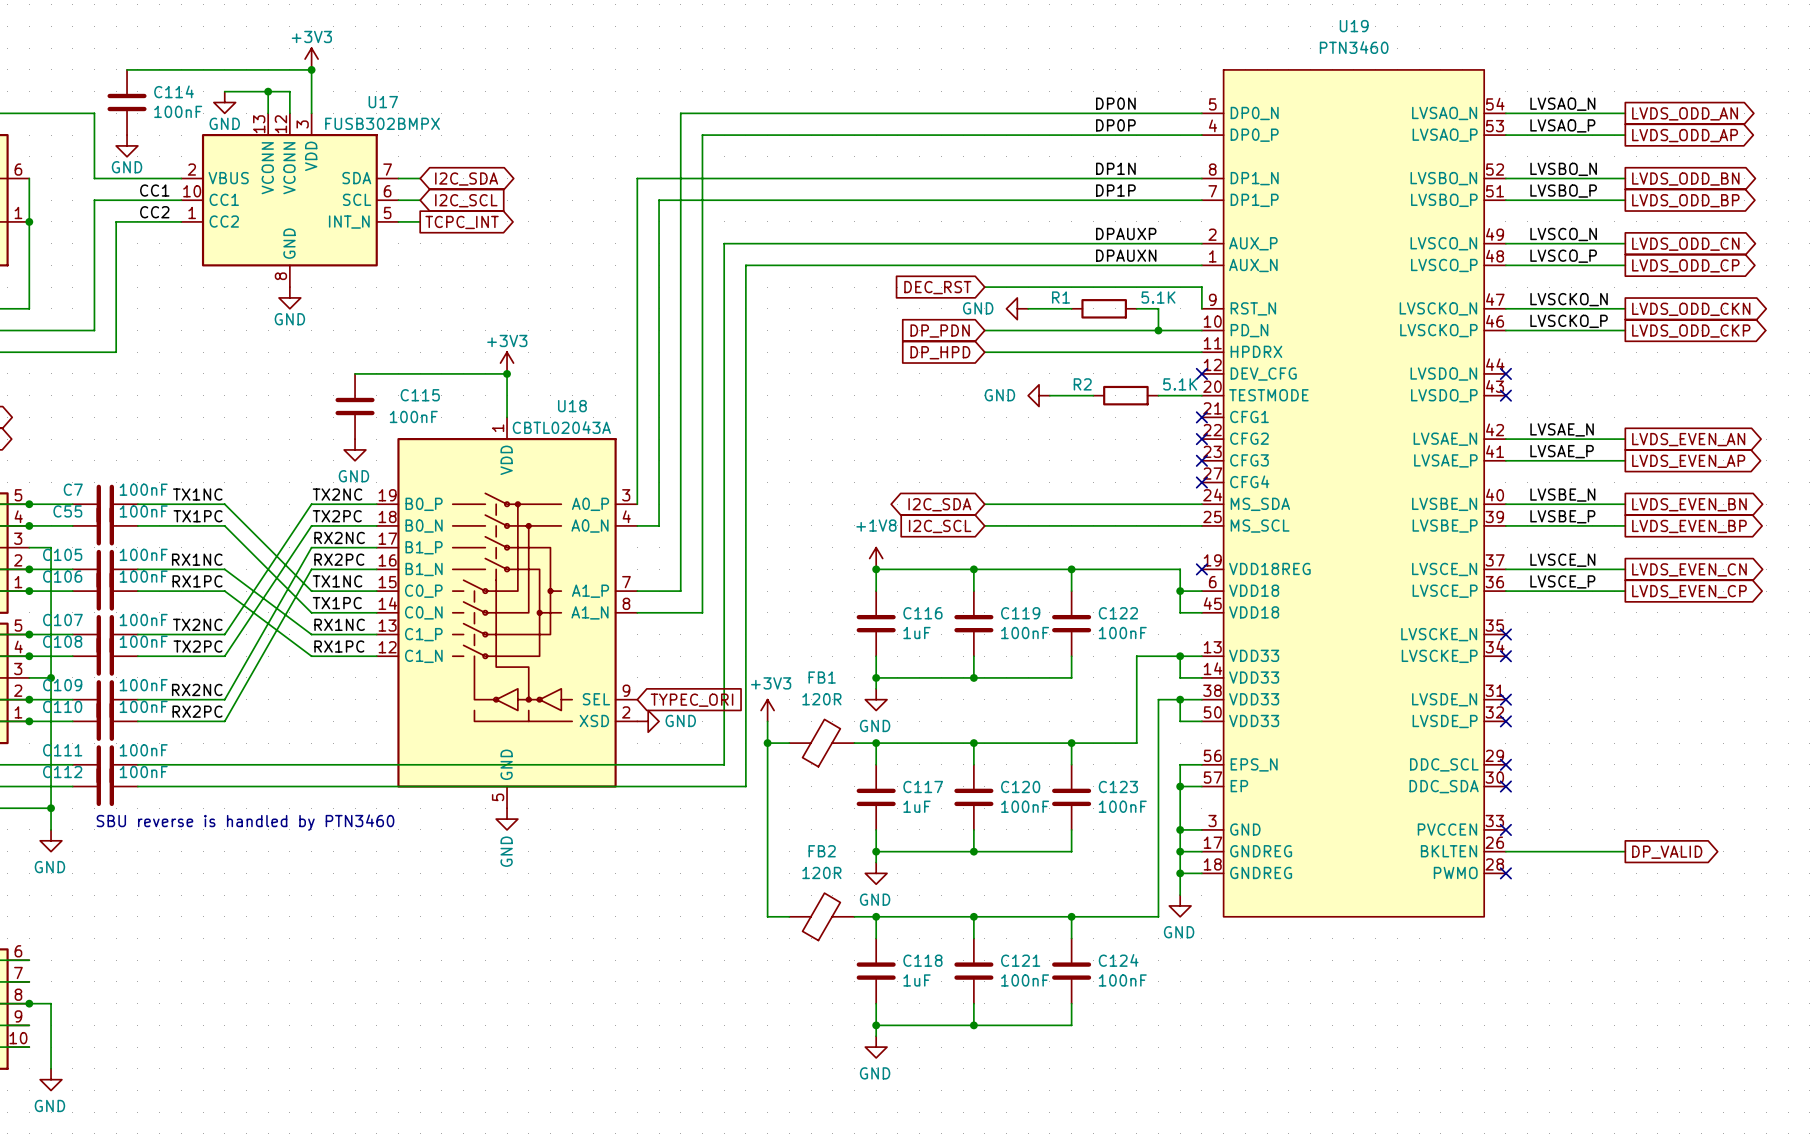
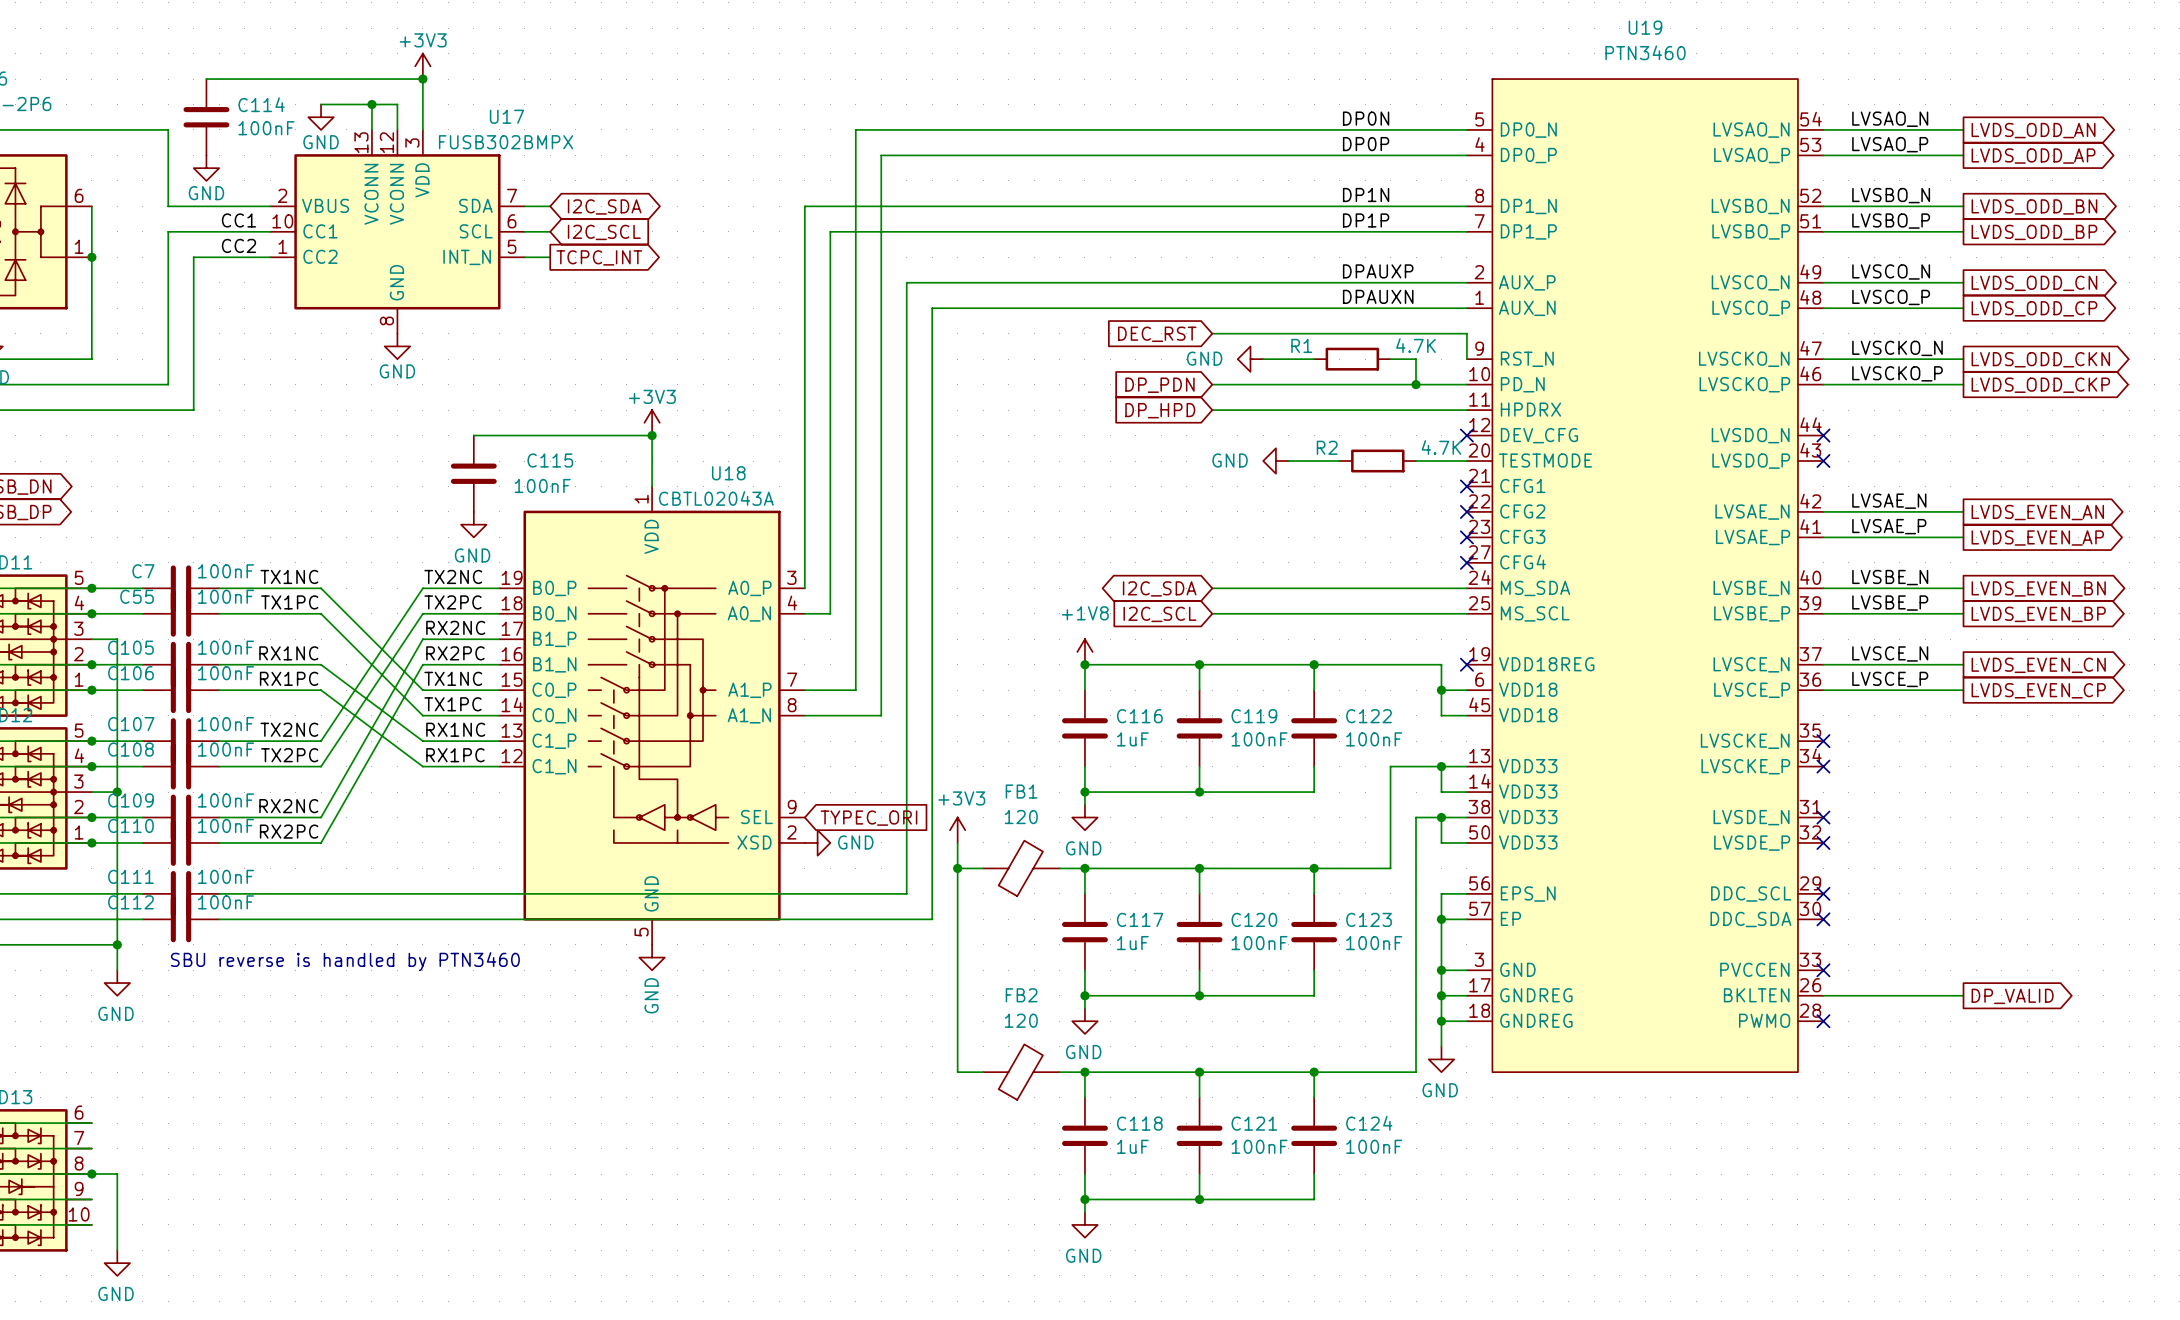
R1 value: 5.1K (1158, 297) -> 4.7K (1416, 345)
R2 value: 5.1K (1180, 384) -> 4.7K (1441, 447)
FB1 value: 120R (821, 699) -> 120 (1021, 817)
FB2 value: 120R (821, 872) -> 120 (1021, 1020)

